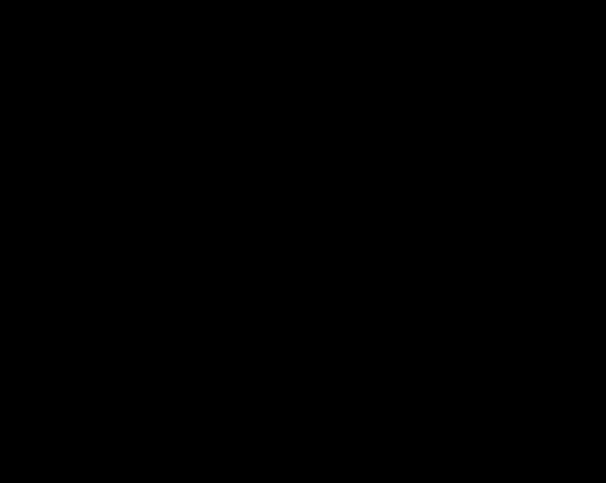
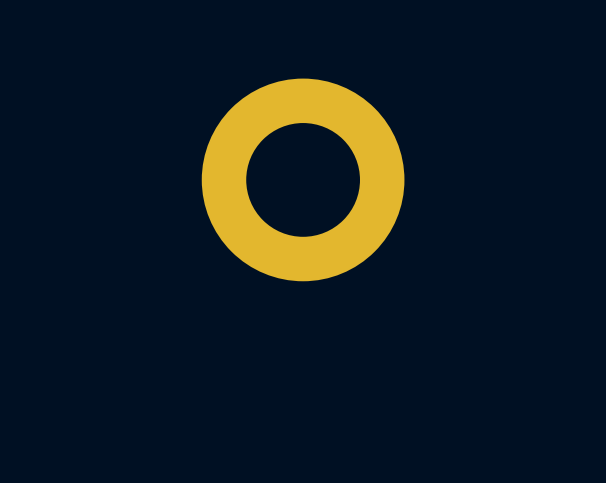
part: none -> (303, 179)

